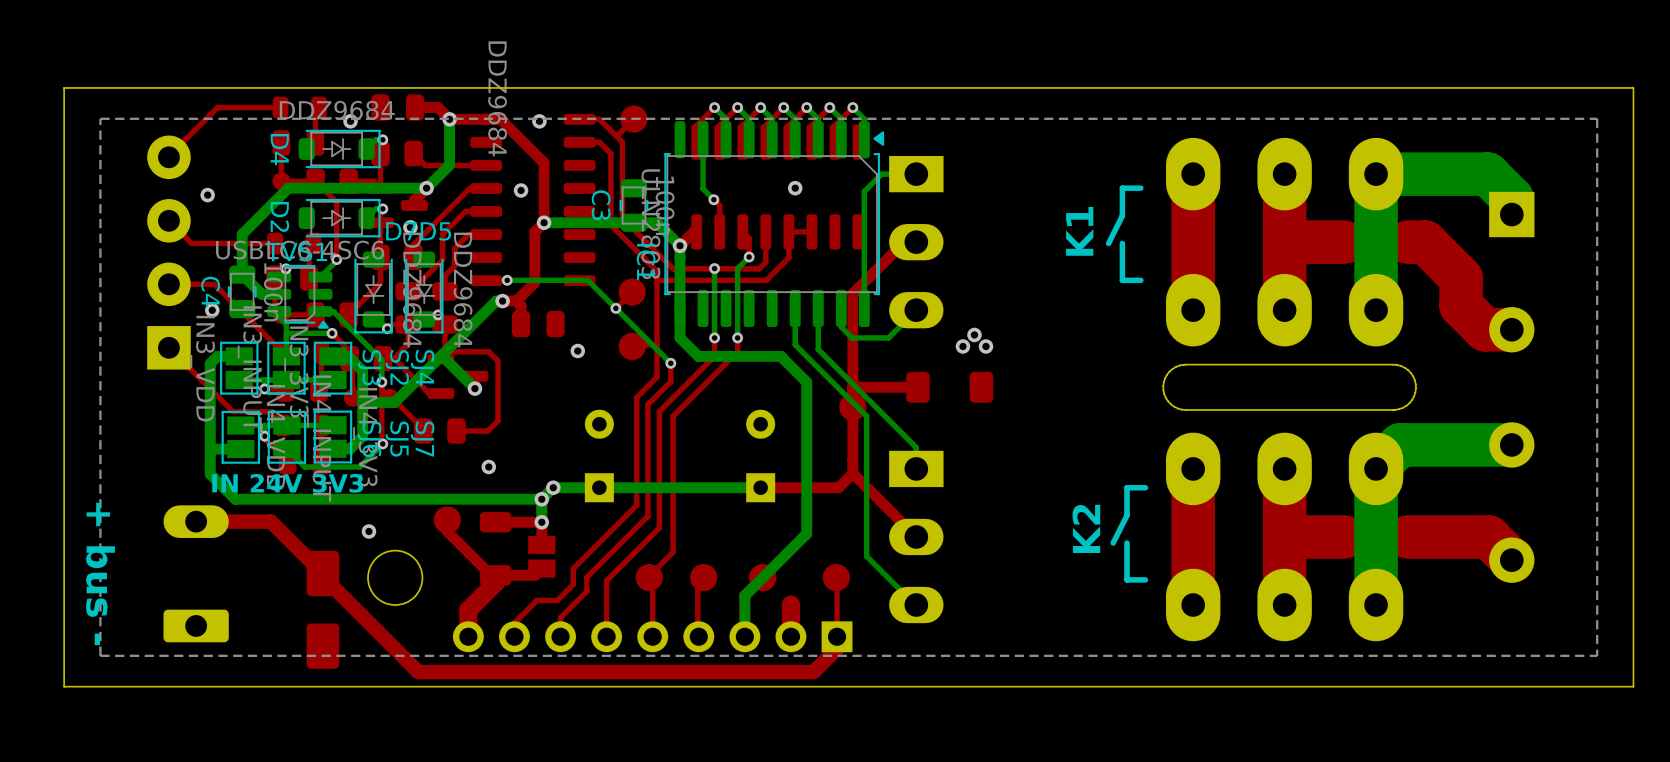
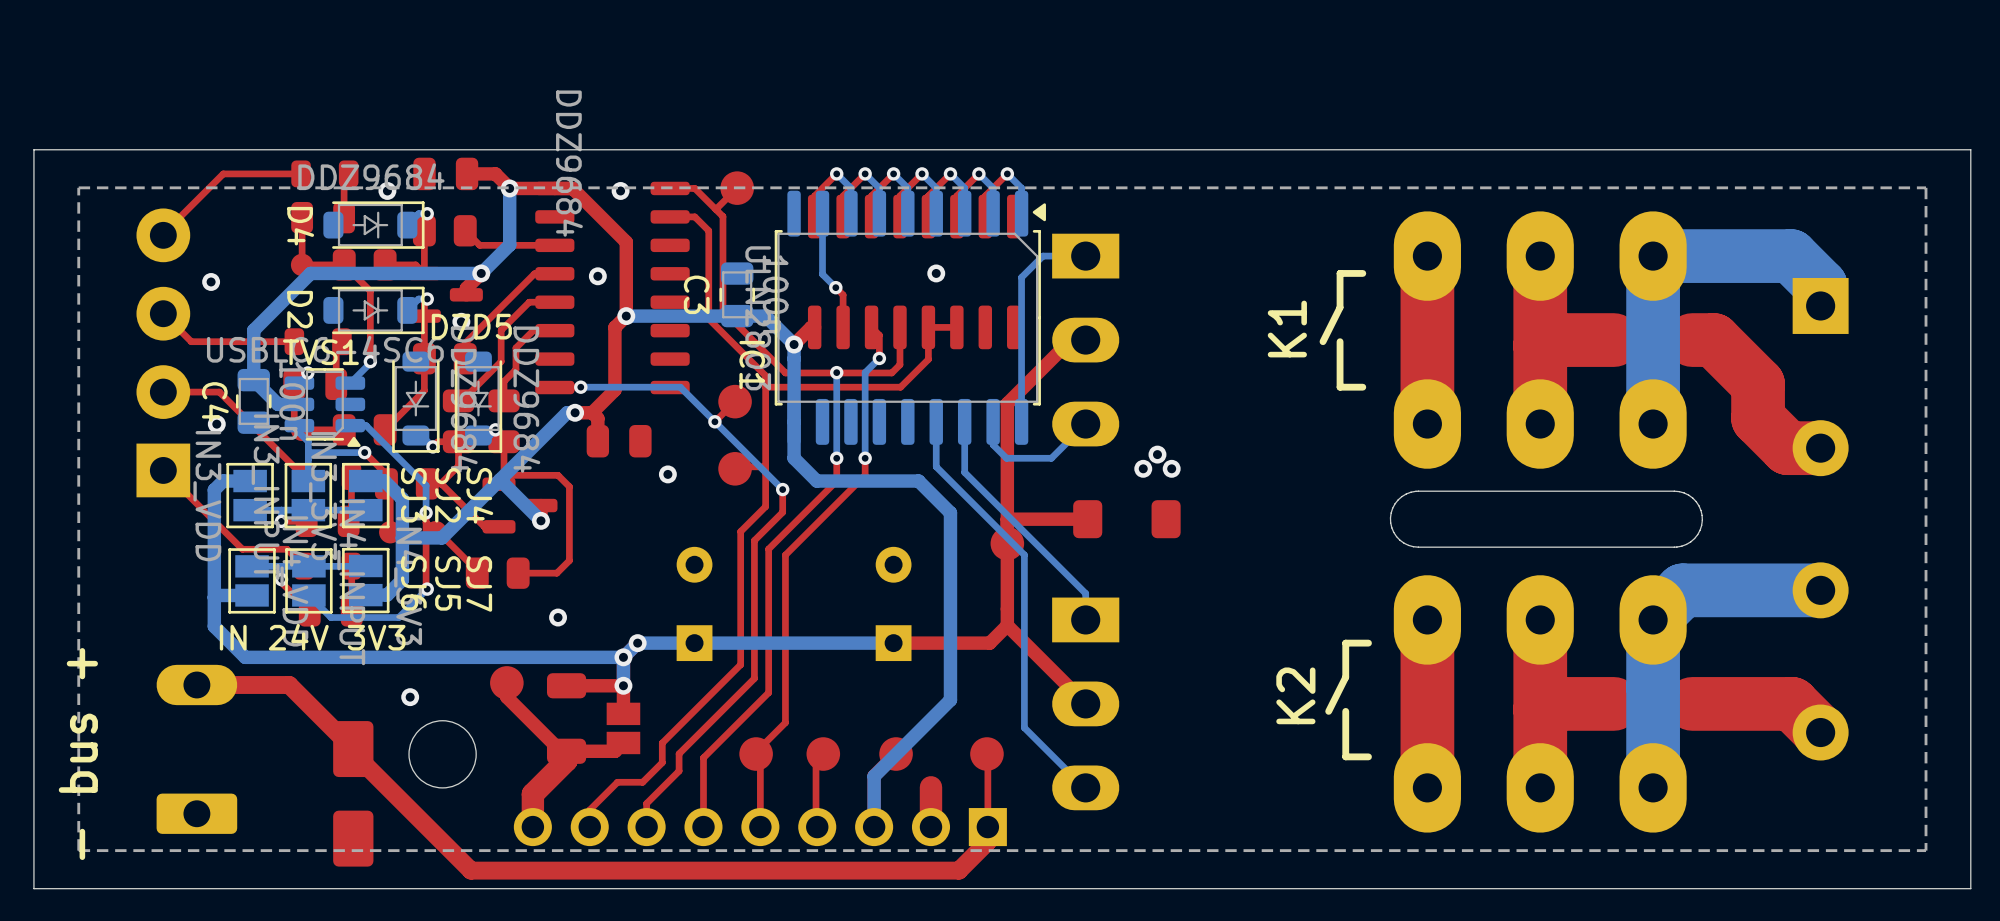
text: + bus - (100, 573) -> - bus + (78, 754)

